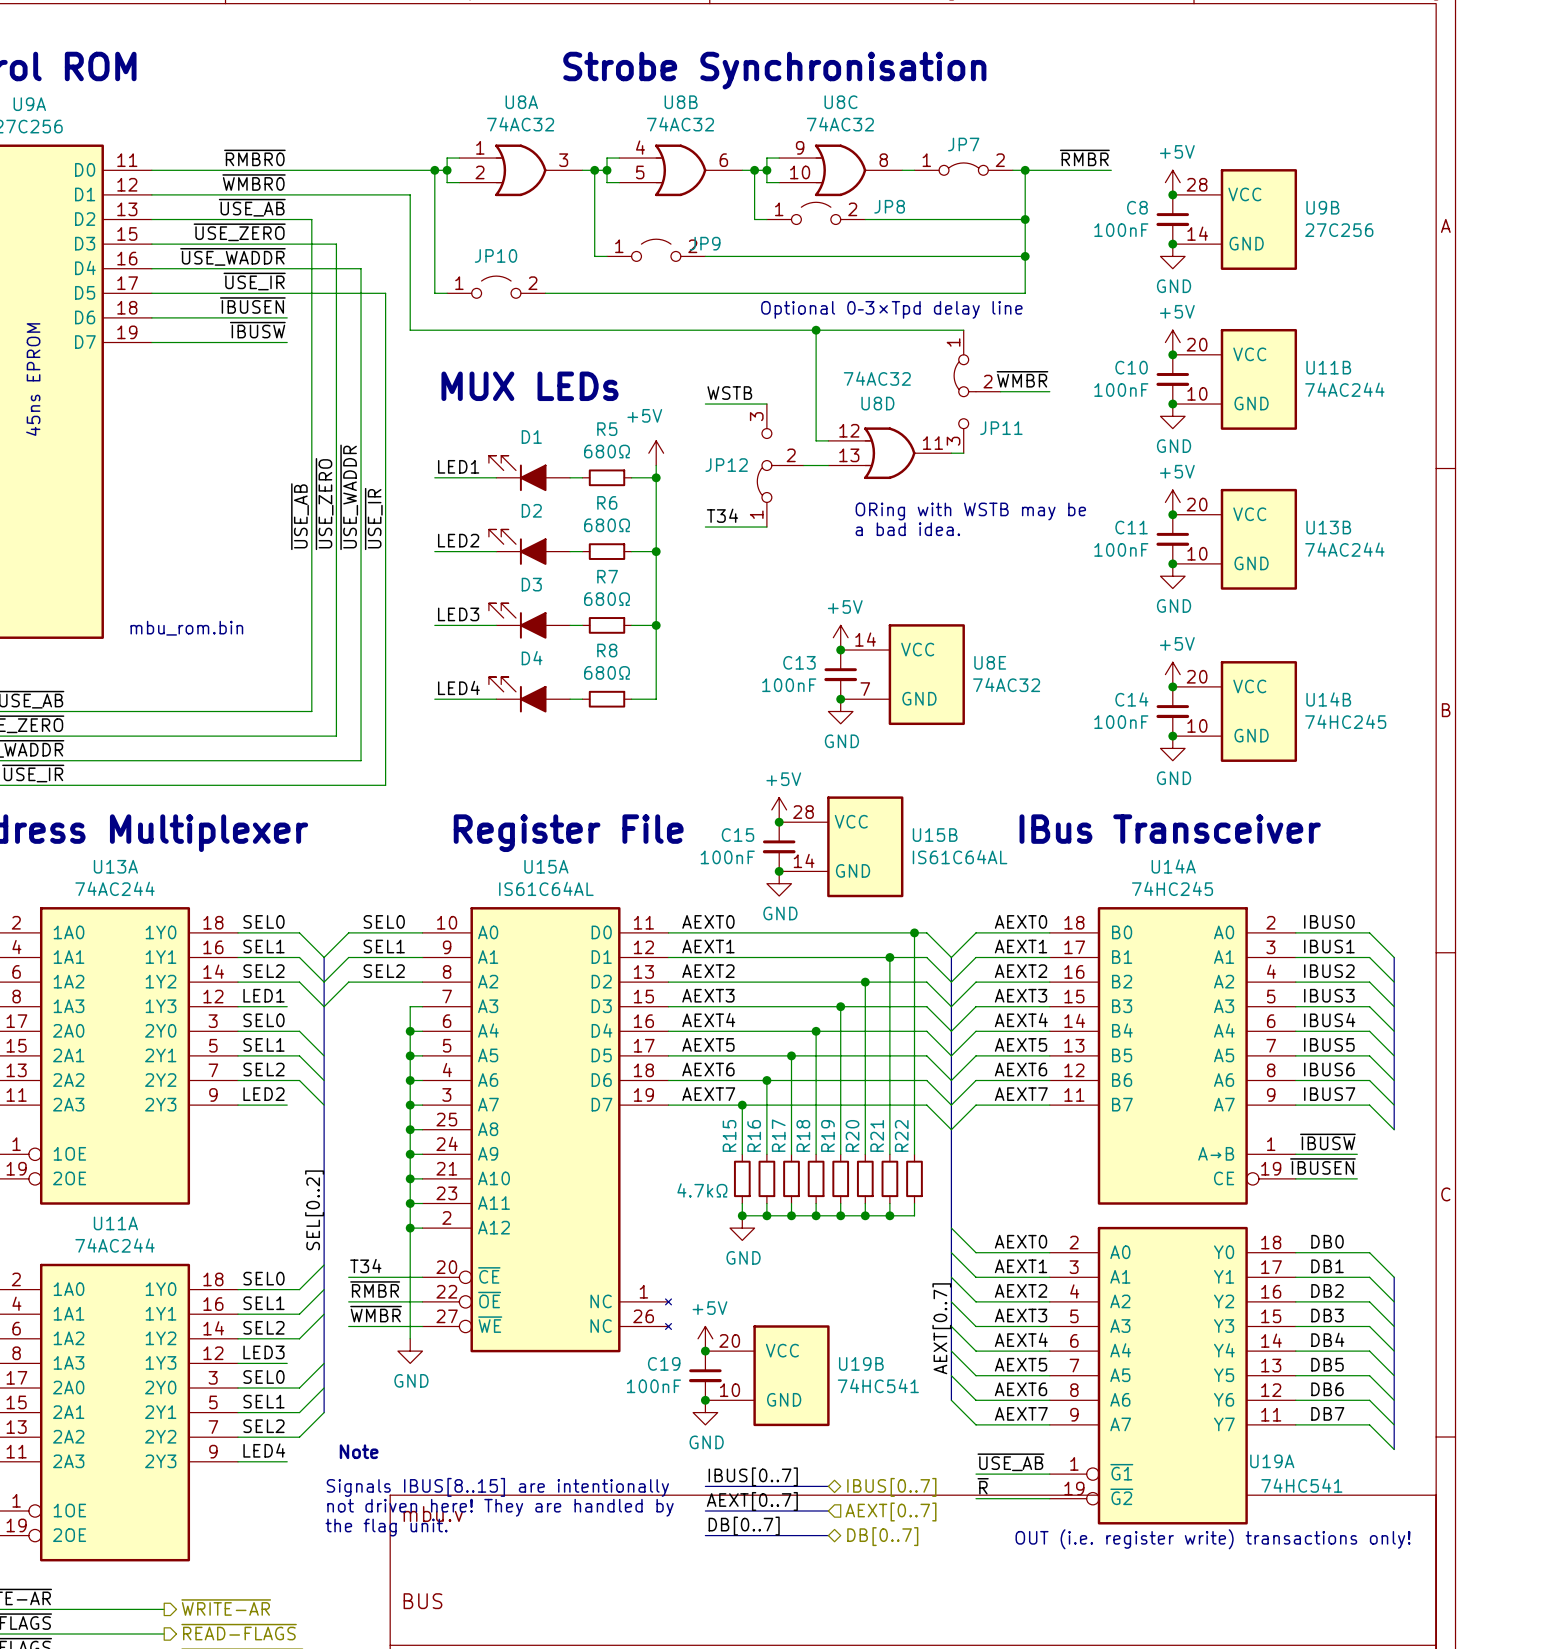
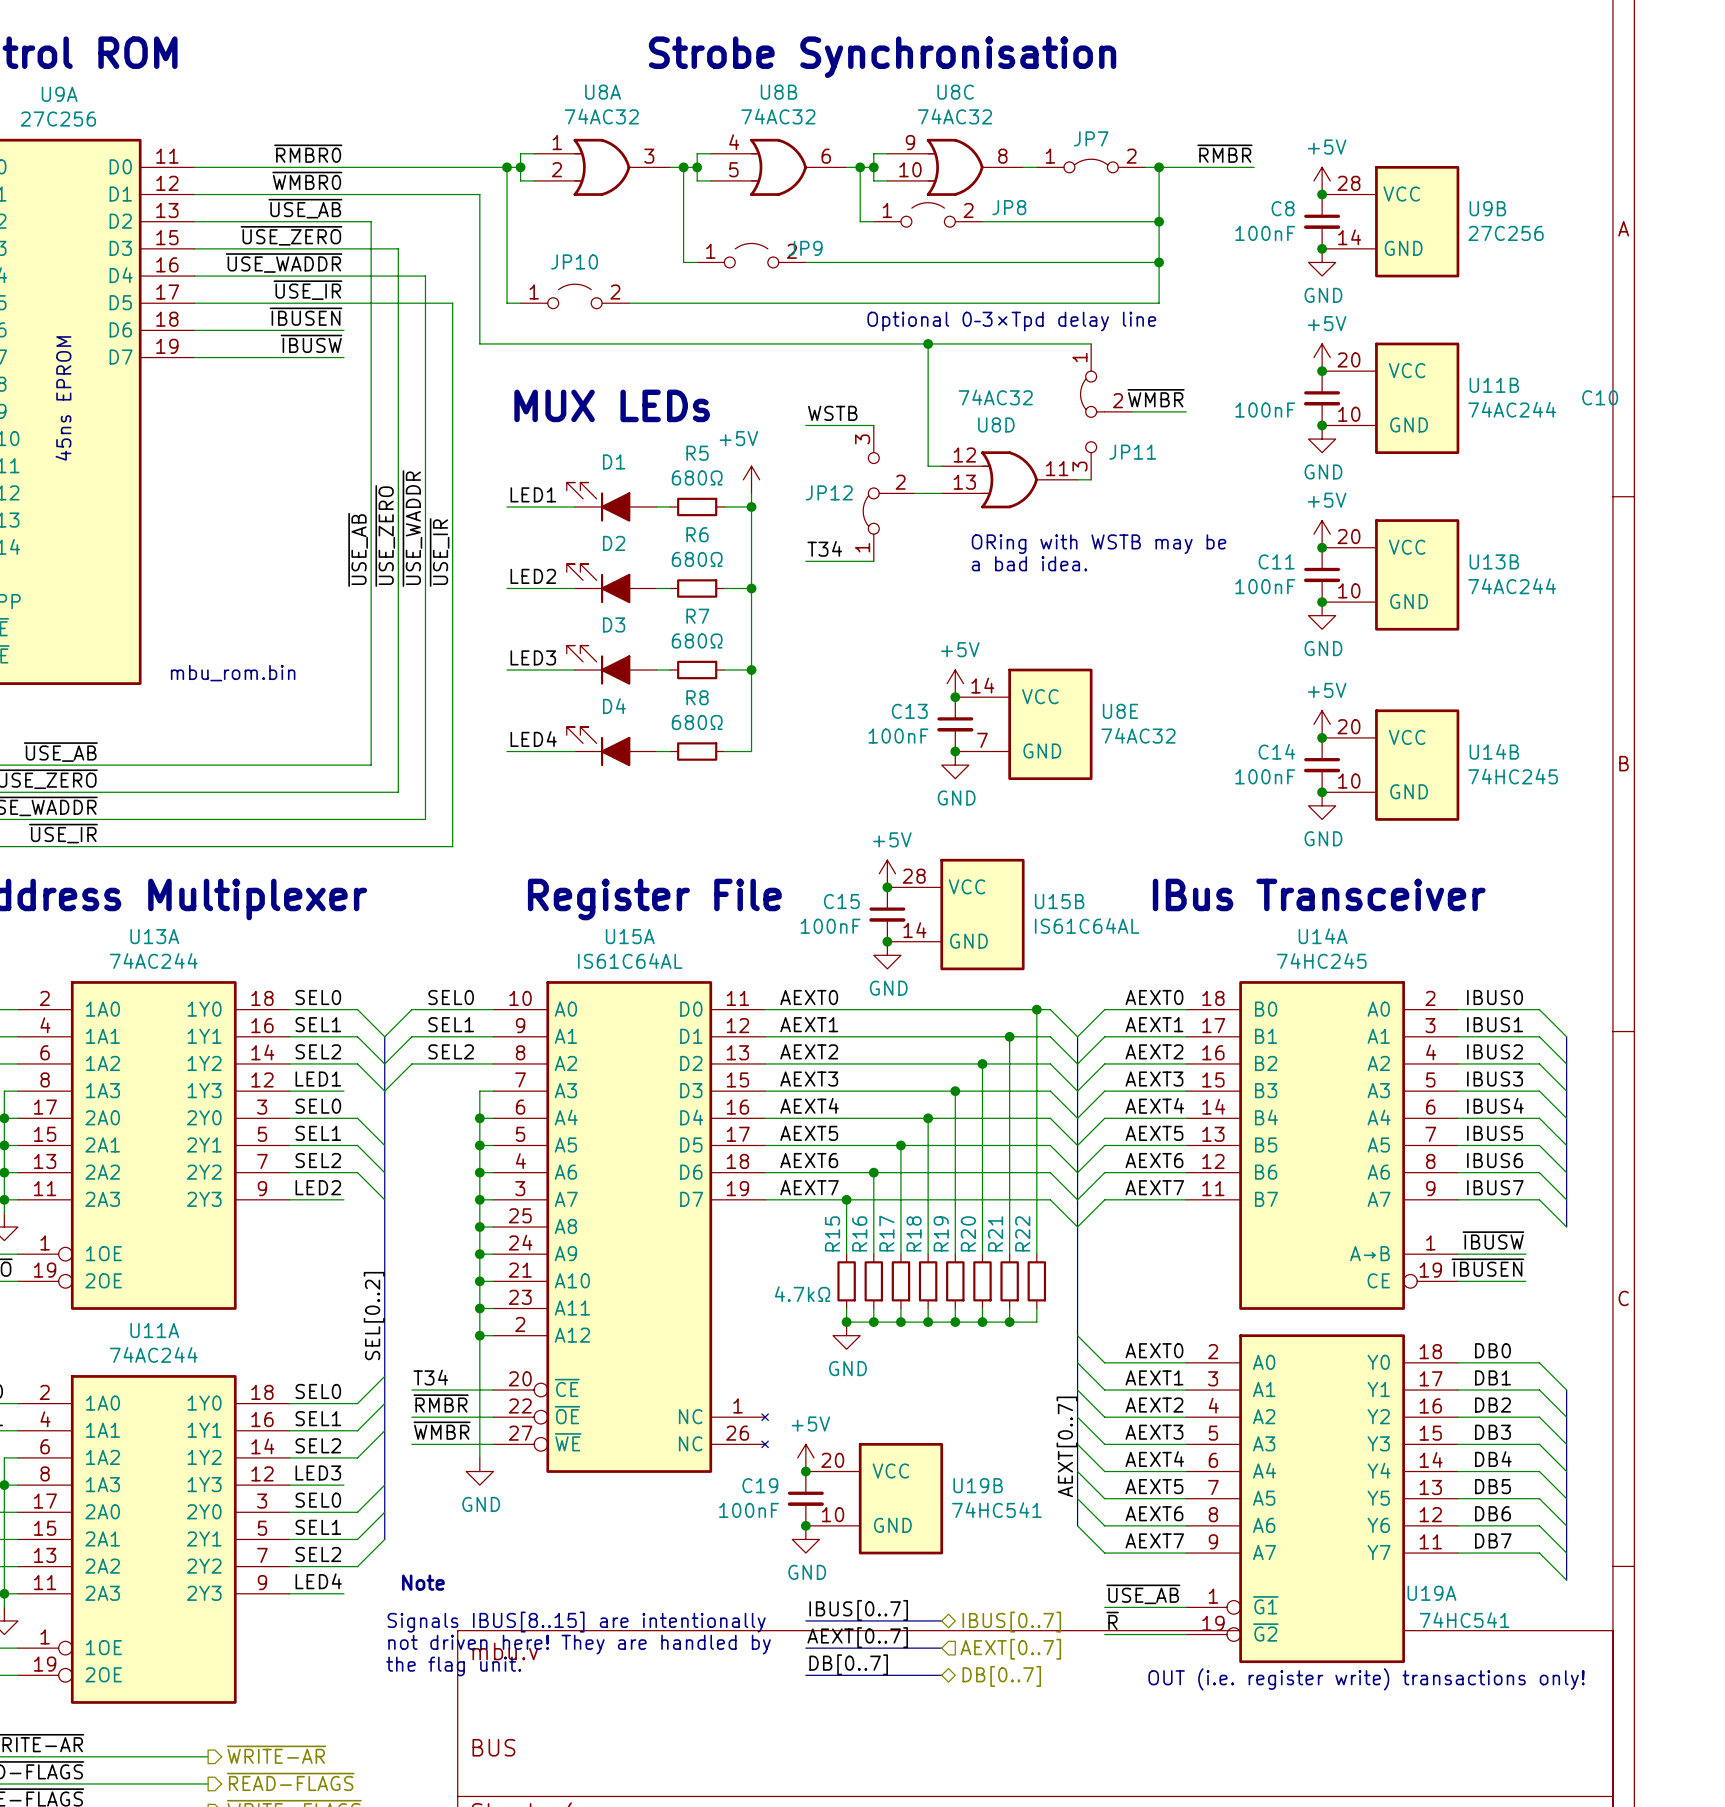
C10 name position: C10 (1131, 367) -> C10 (1600, 397)

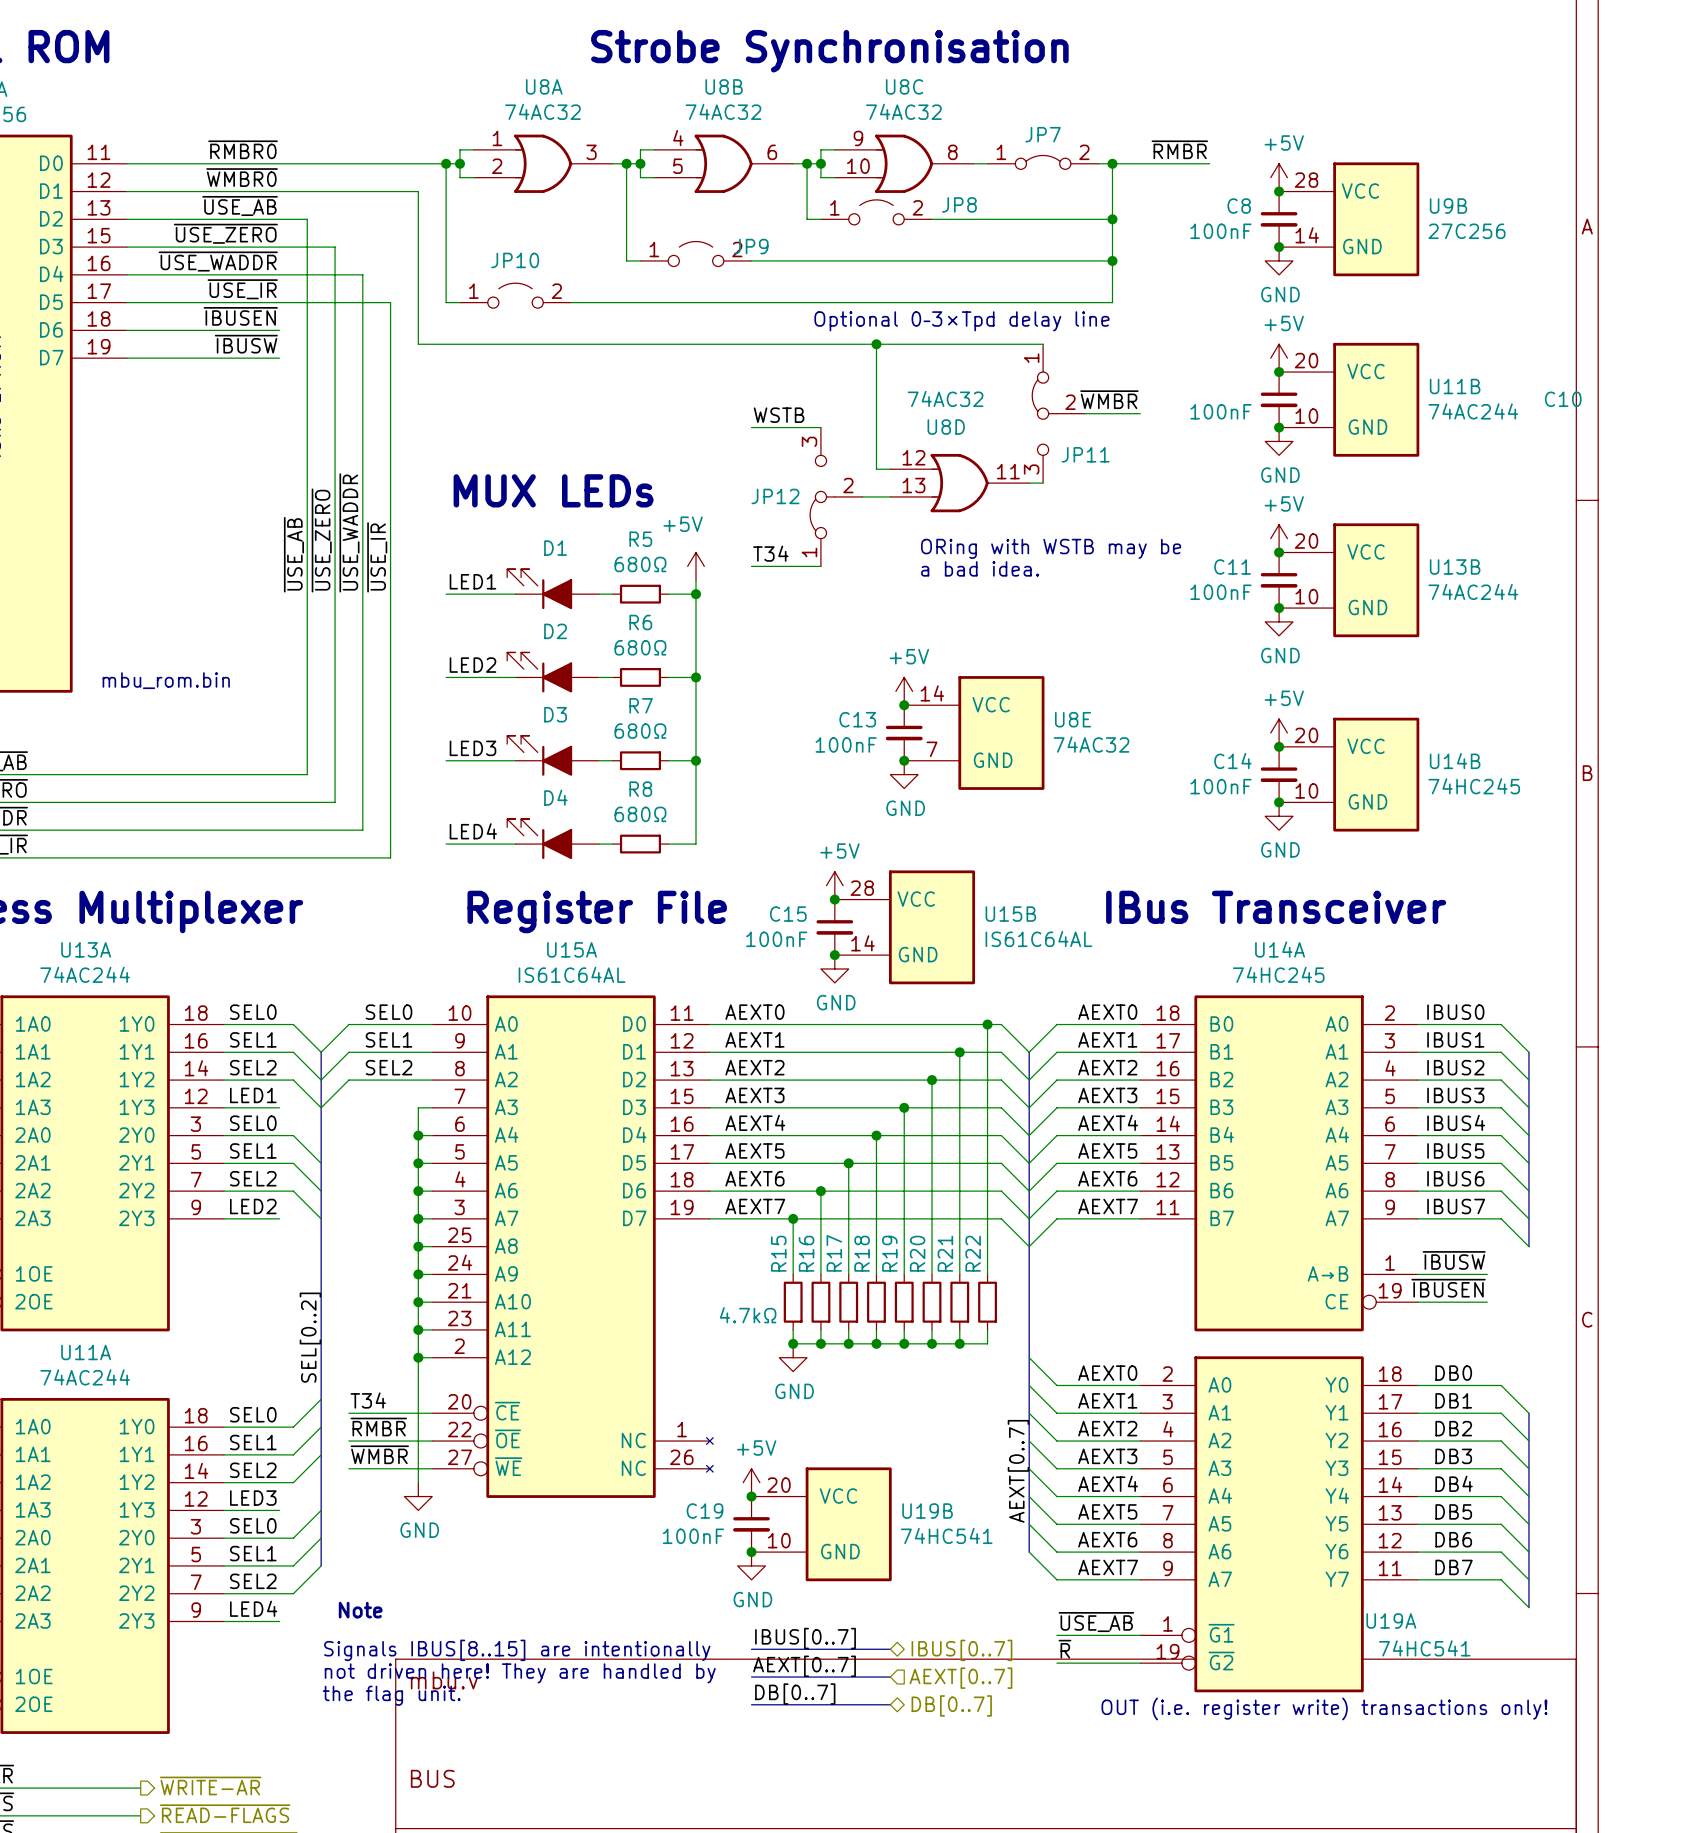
text position: MUX LEDs (612, 405) -> MUX LEDs (553, 490)
power symbol position: +5V (751, 479) -> +5V (696, 566)
wire: (751, 493) (751, 574) -> none
label: LED1 (533, 494) -> none
D1: (611, 502) -> none
wire: (506, 506) (574, 506) -> none
wire: (656, 506) (670, 506) -> none
R5: 680Ω (697, 506) -> none
wire: (724, 506) (751, 506) -> none
junction: (751, 506) -> none
R6 name: R6 (697, 534) -> R5 (640, 539)
D2 name: D2 (614, 543) -> D1 (555, 548)
label: LED2 (533, 576) -> LED1 (472, 581)
R7 name: R7 (697, 616) -> R6 (640, 622)
D3 name: D3 (614, 624) -> D2 (555, 631)
label: LED3 (533, 657) -> LED2 (472, 665)
R8 name: R8 (697, 697) -> R7 (641, 705)
D4 name: D4 (614, 706) -> D3 (555, 714)
label: LED4 (533, 739) -> LED3 (472, 748)
wire: none -> (696, 760) (696, 844) (668, 844)
junction: none -> (696, 760)
label: none -> LED4 (473, 831)
D4: none -> (553, 839)
wire: none -> (446, 844) (515, 844)
wire: none -> (598, 844) (612, 844)
R8: none -> 680Ω (640, 844)

